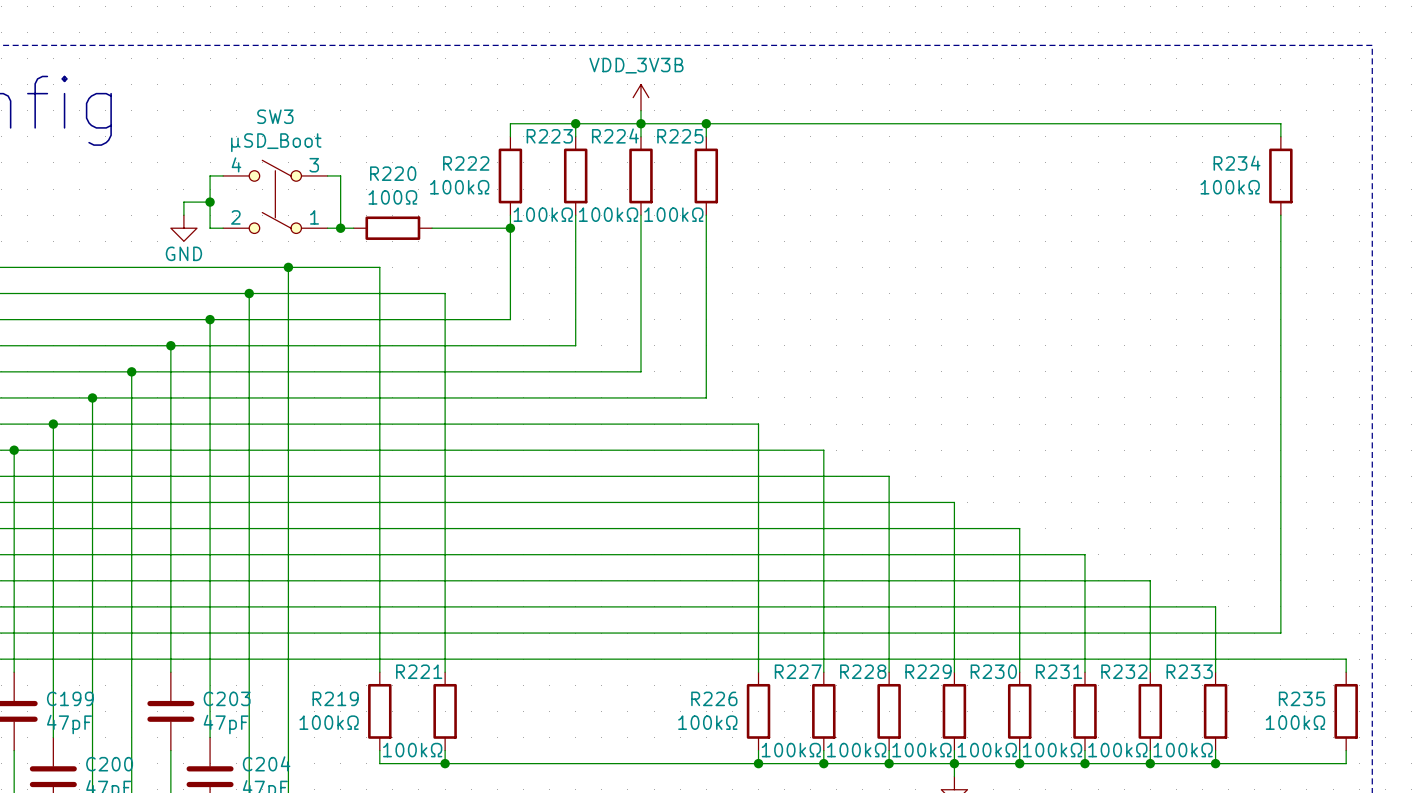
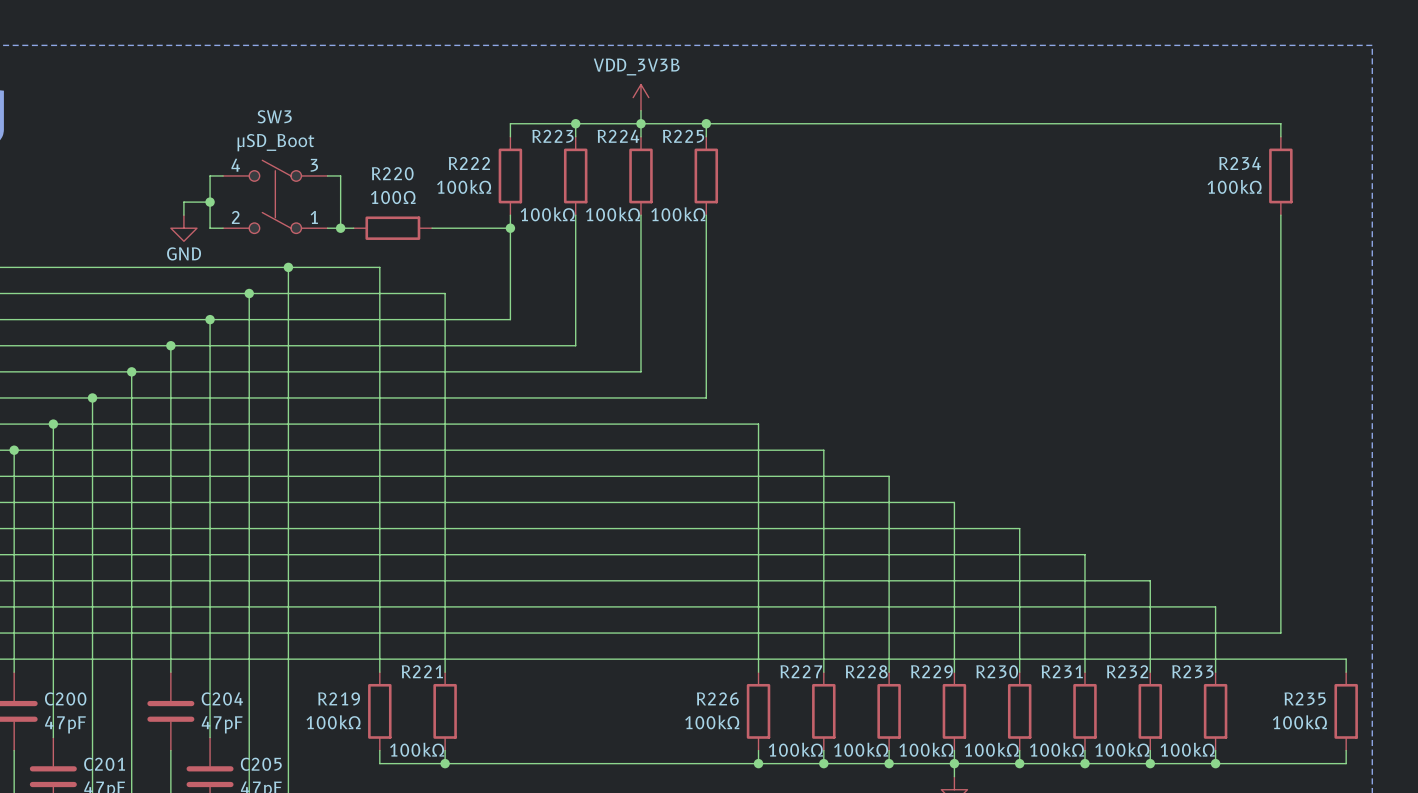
C199 name: C199 (70, 698) -> C200 (65, 698)
C203 name: C203 (227, 698) -> C204 (222, 698)
C204 name: C204 (266, 763) -> C205 (261, 764)
C200 name: C200 (109, 764) -> C201 (104, 764)

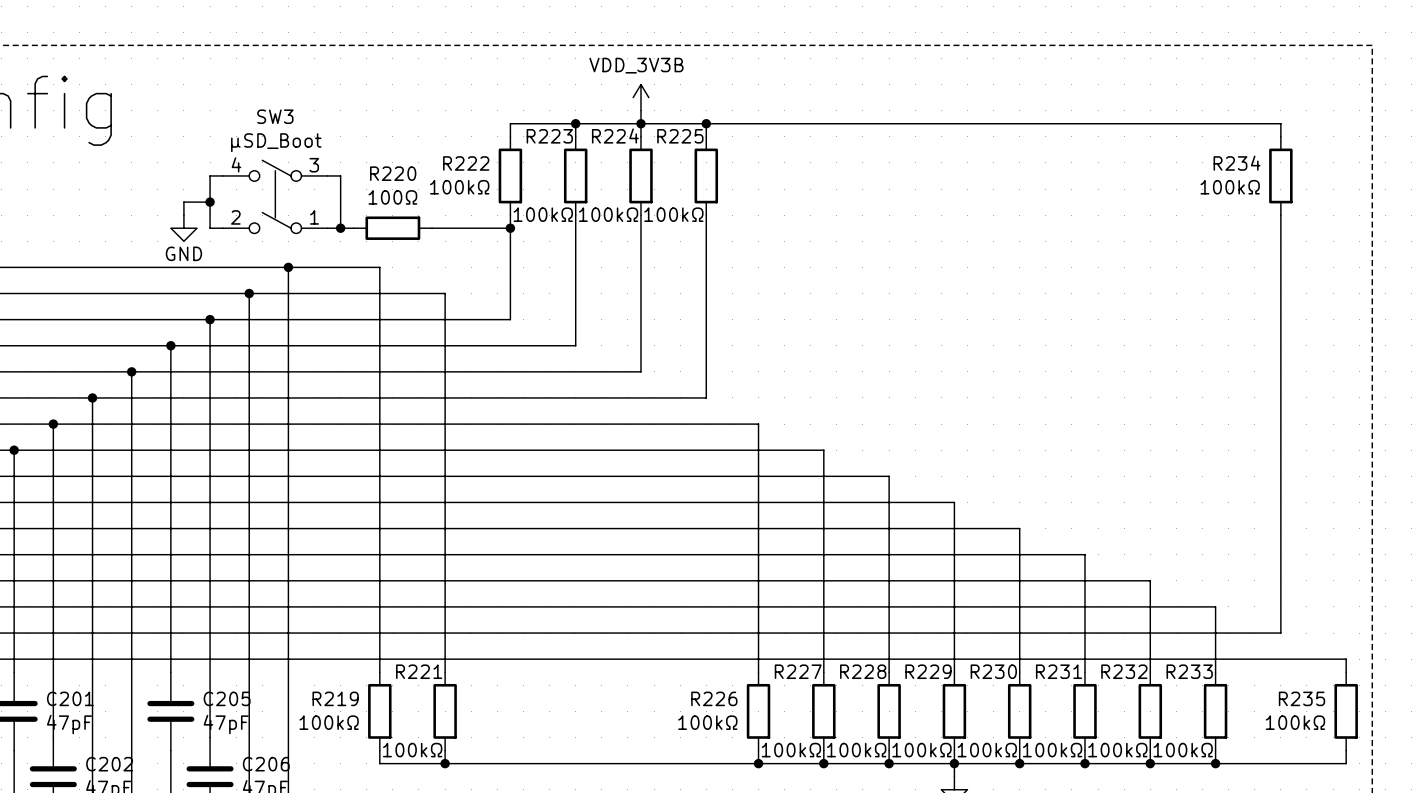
C200 name: C200 (65, 698) -> C201 (70, 698)
C204 name: C204 (222, 698) -> C205 (227, 698)
C201 name: C201 (104, 764) -> C202 (109, 764)
C205 name: C205 (261, 764) -> C206 (266, 764)

